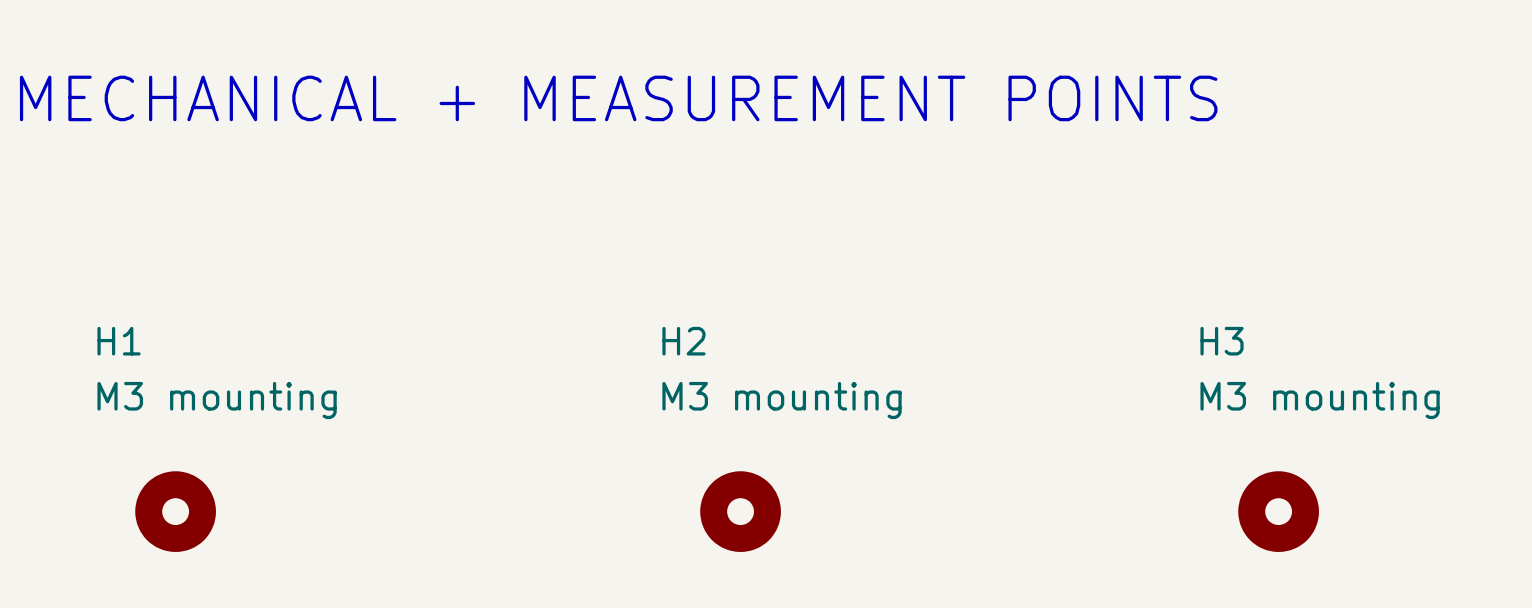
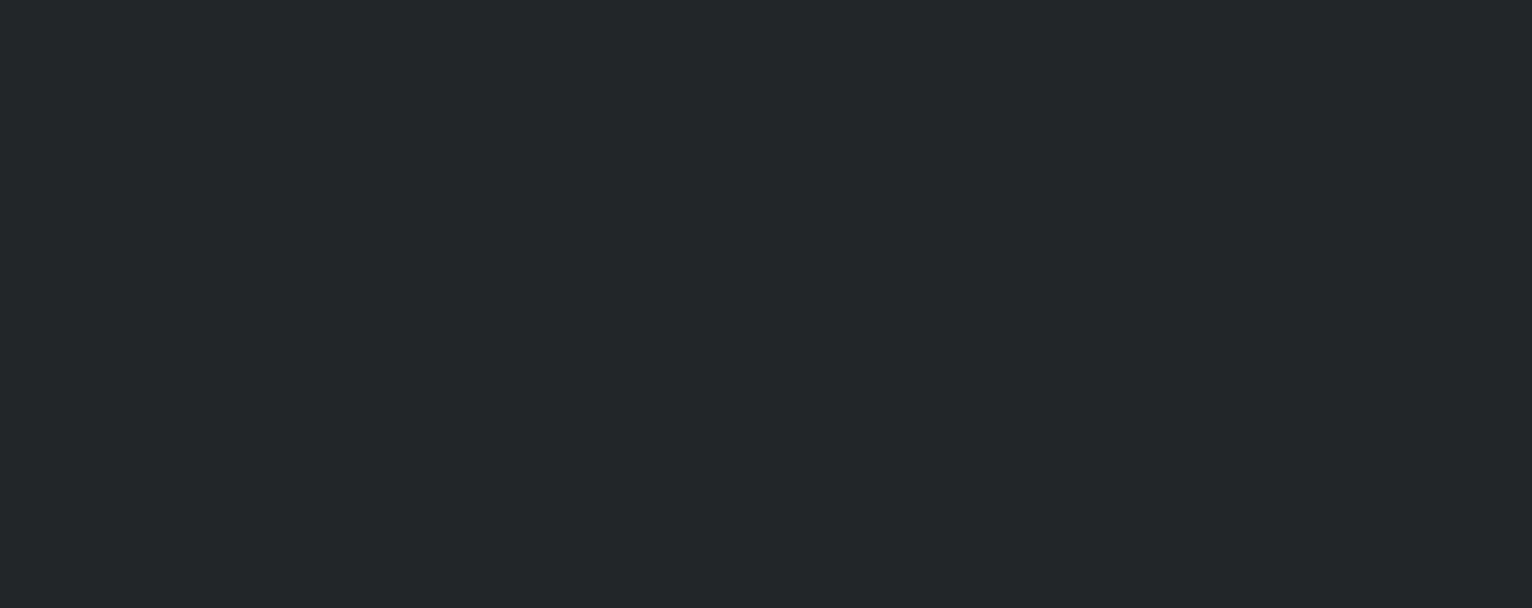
text: MECHANICAL + MEASUREMENT POINTS (618, 98) -> none
H1: M3 mounting (175, 511) -> none
H2: M3 mounting (740, 511) -> none
H3: M3 mounting (1278, 511) -> none

